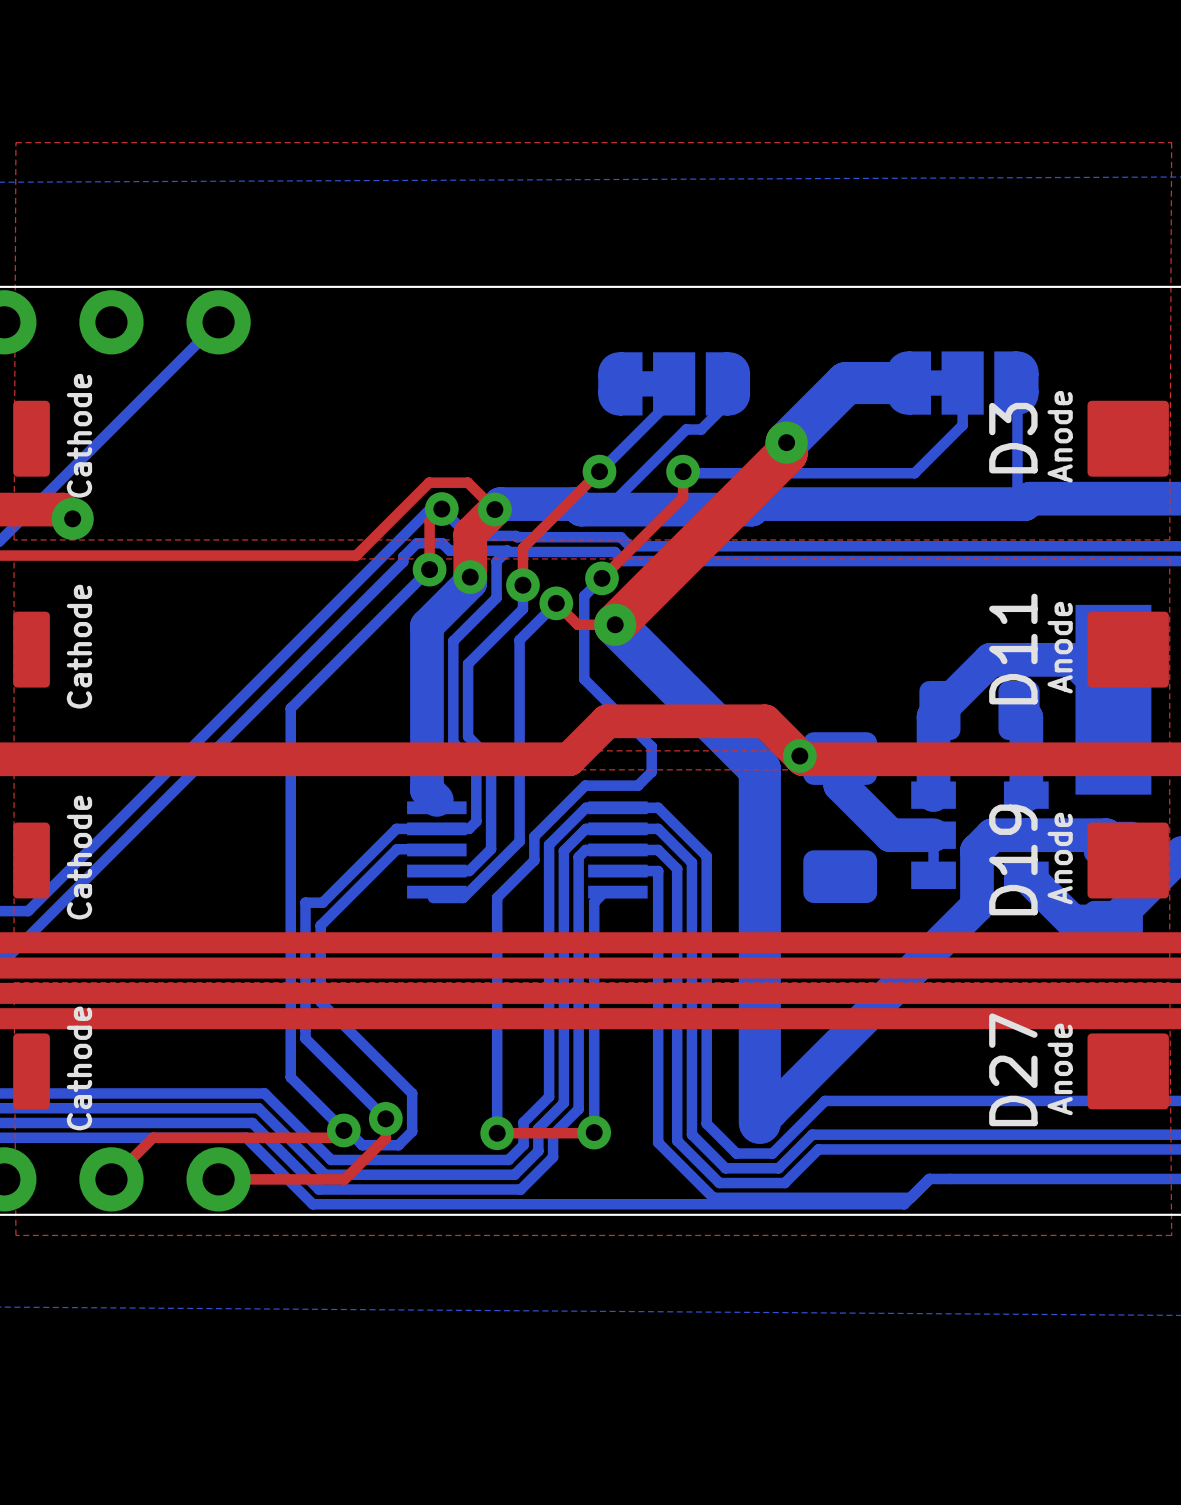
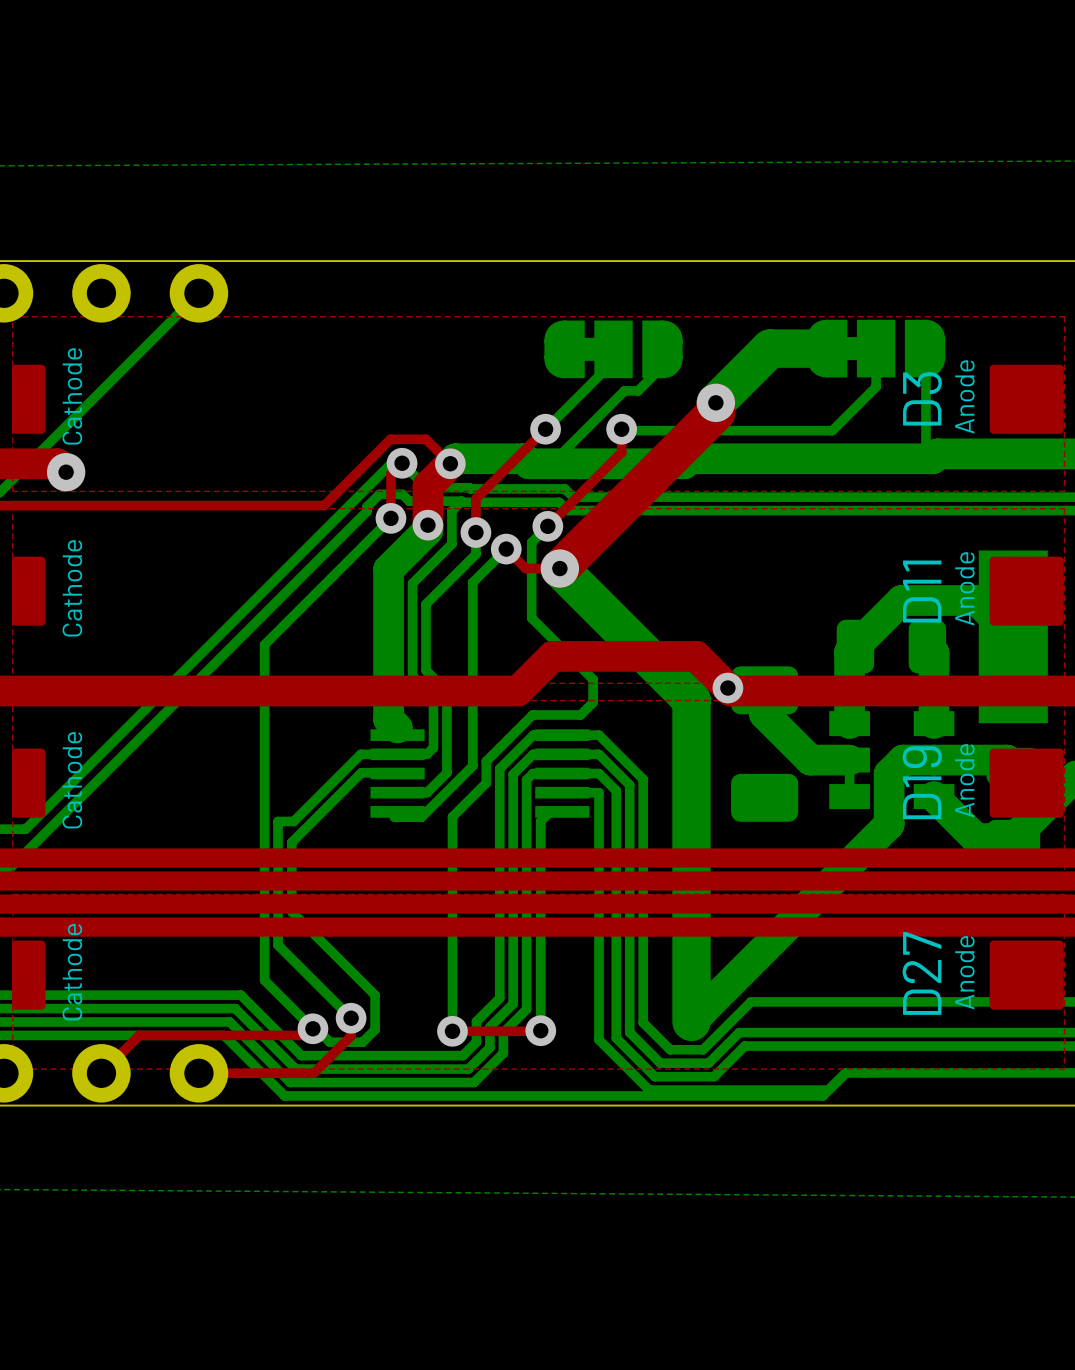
top zone outline: (14, 539) (15, 142) (1171, 142) (1169, 539) -> (12, 491) (12, 316) (1064, 316) (1064, 491)
top zone outline: (14, 982) (15, 1235) (1171, 1235) (1169, 982) -> (12, 894) (12, 1069) (1064, 1069) (1064, 894)

